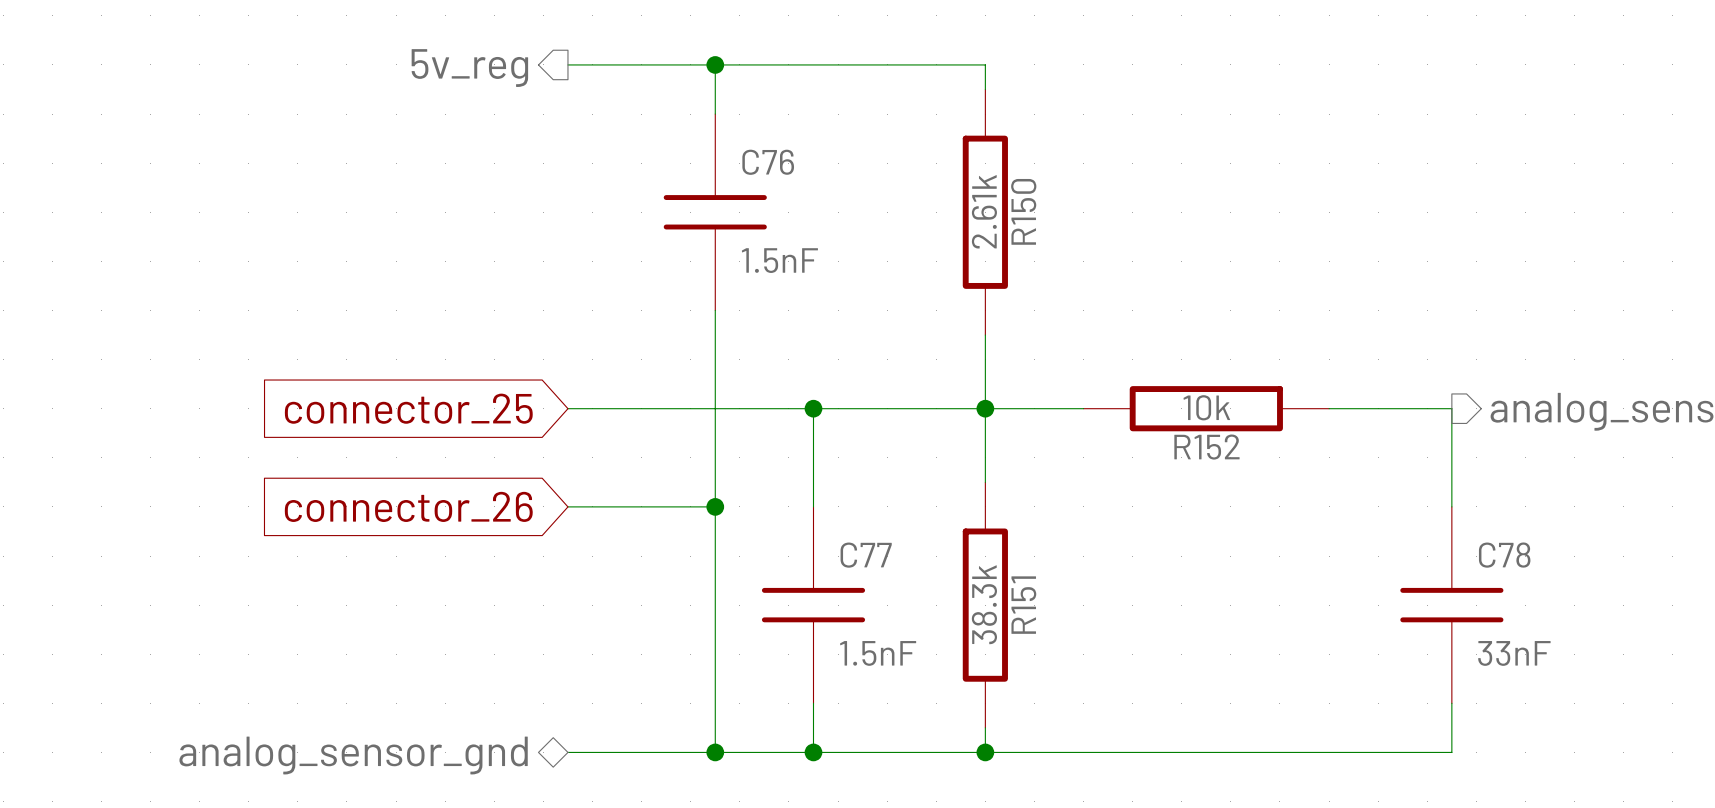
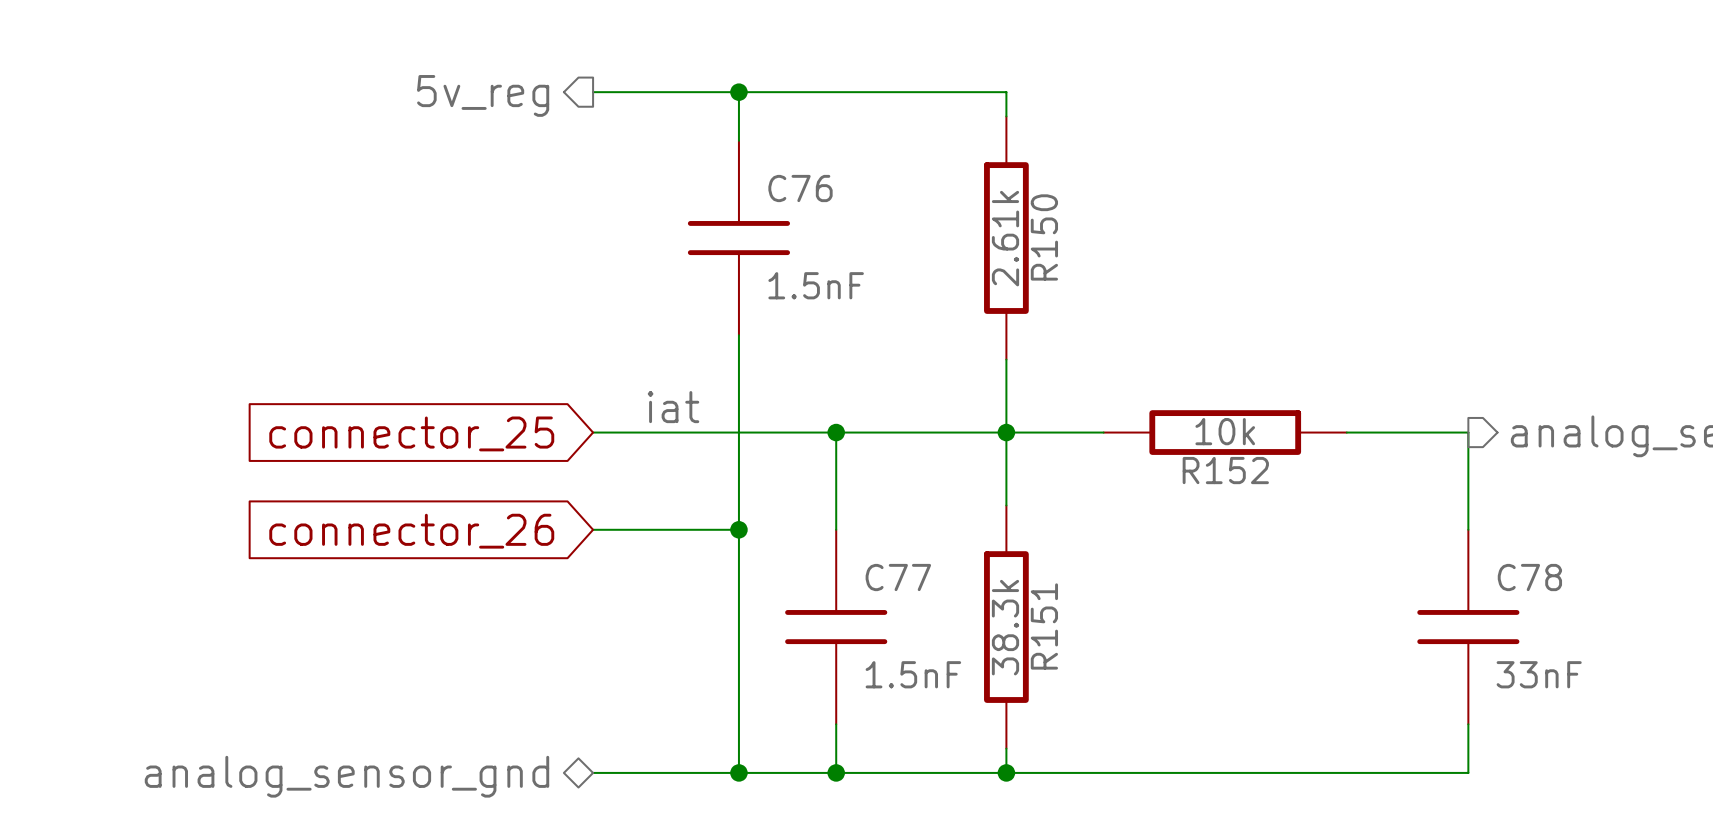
label: none -> iat (673, 407)

